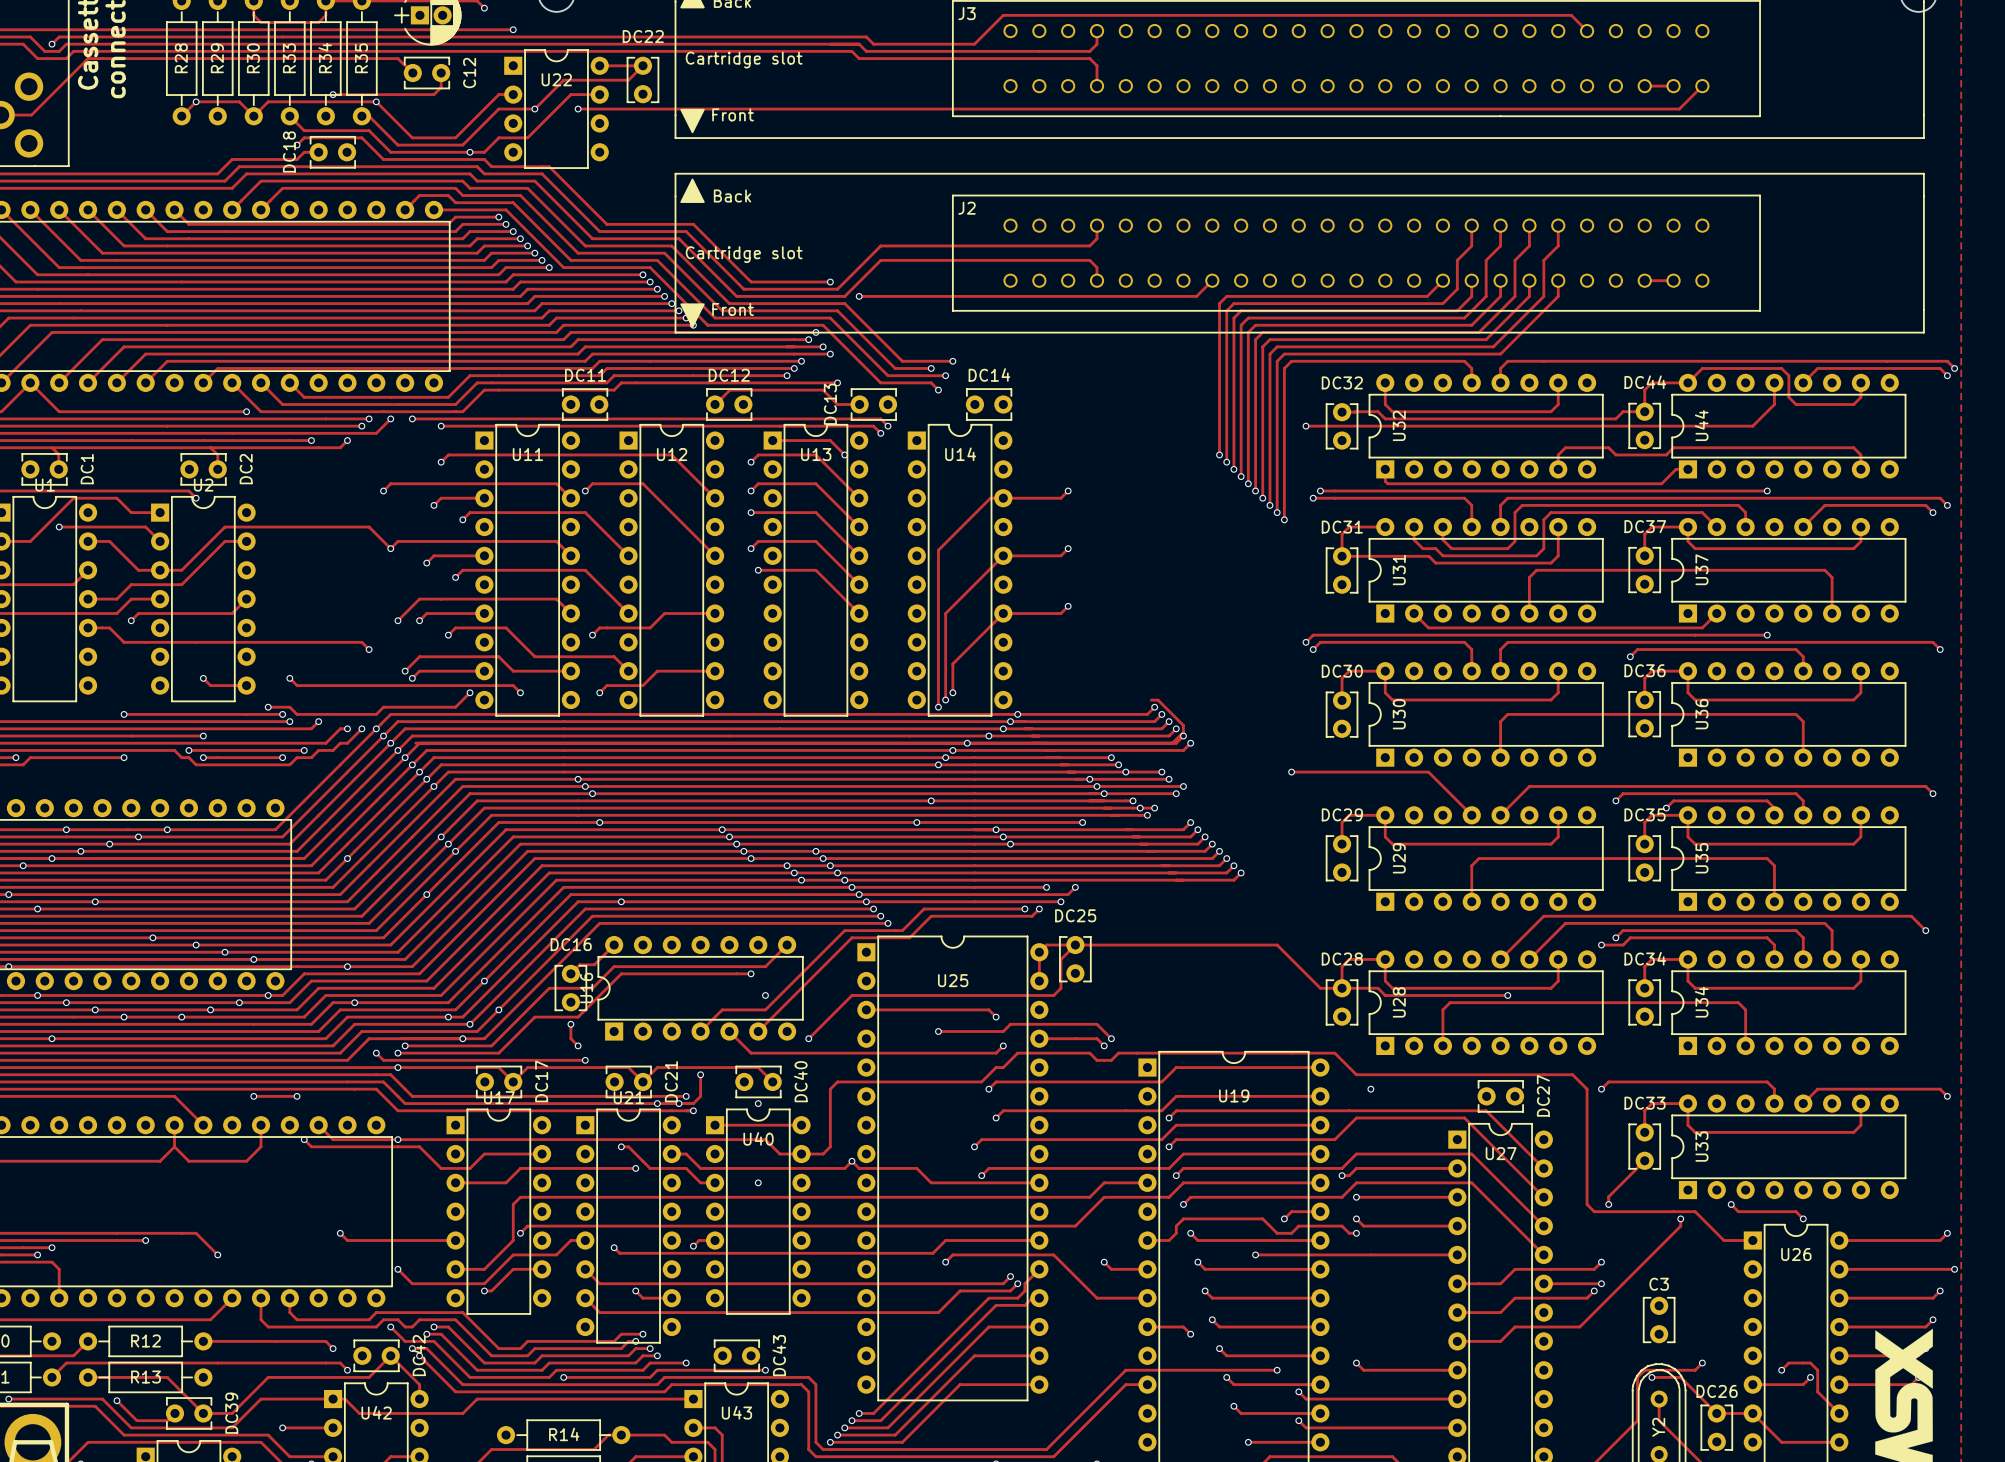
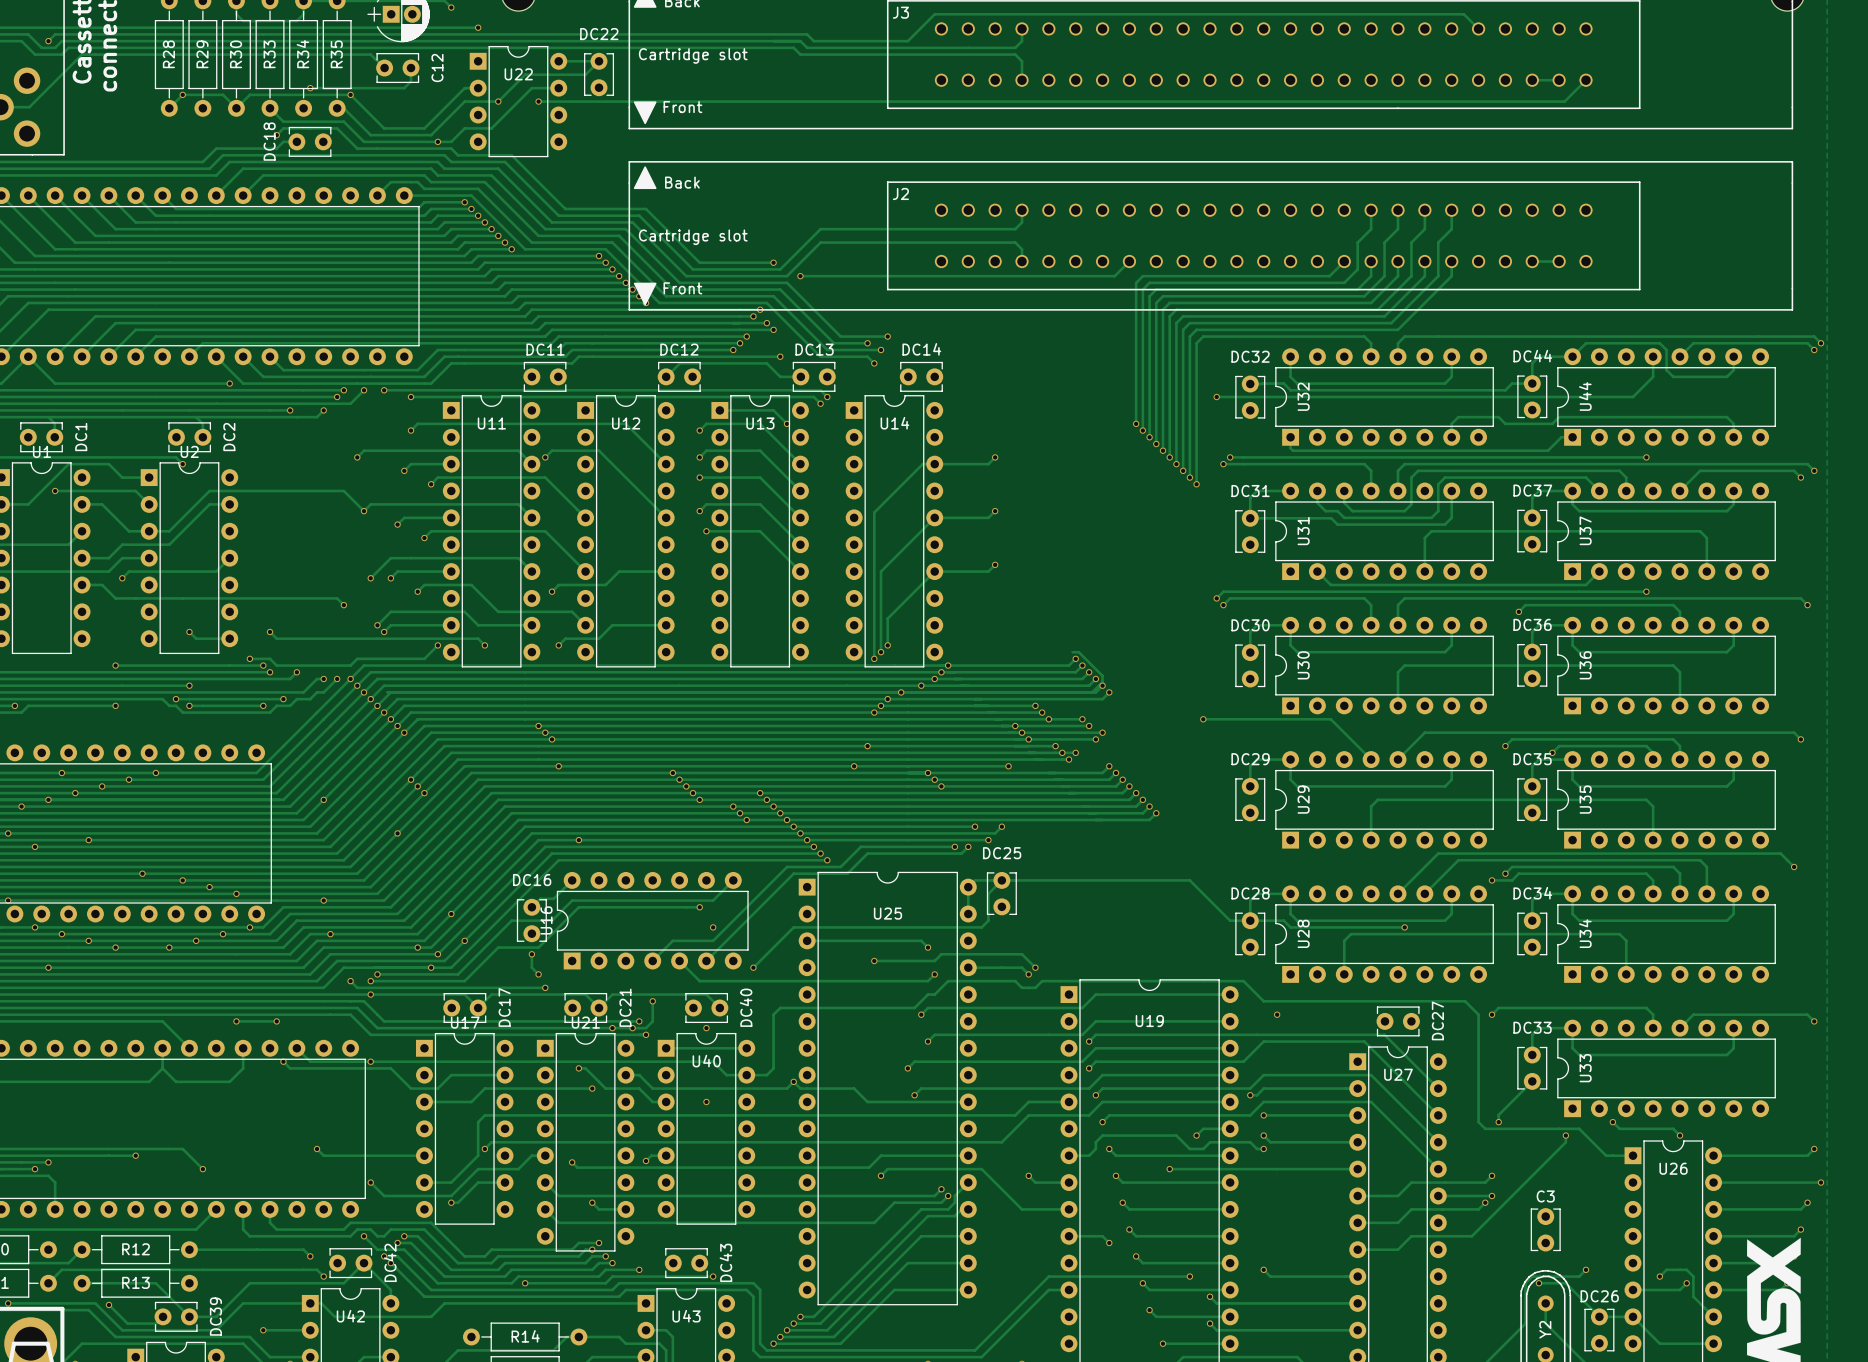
DC13 name rotation: 0° (830, 404) -> 90° clockwise (814, 349)

